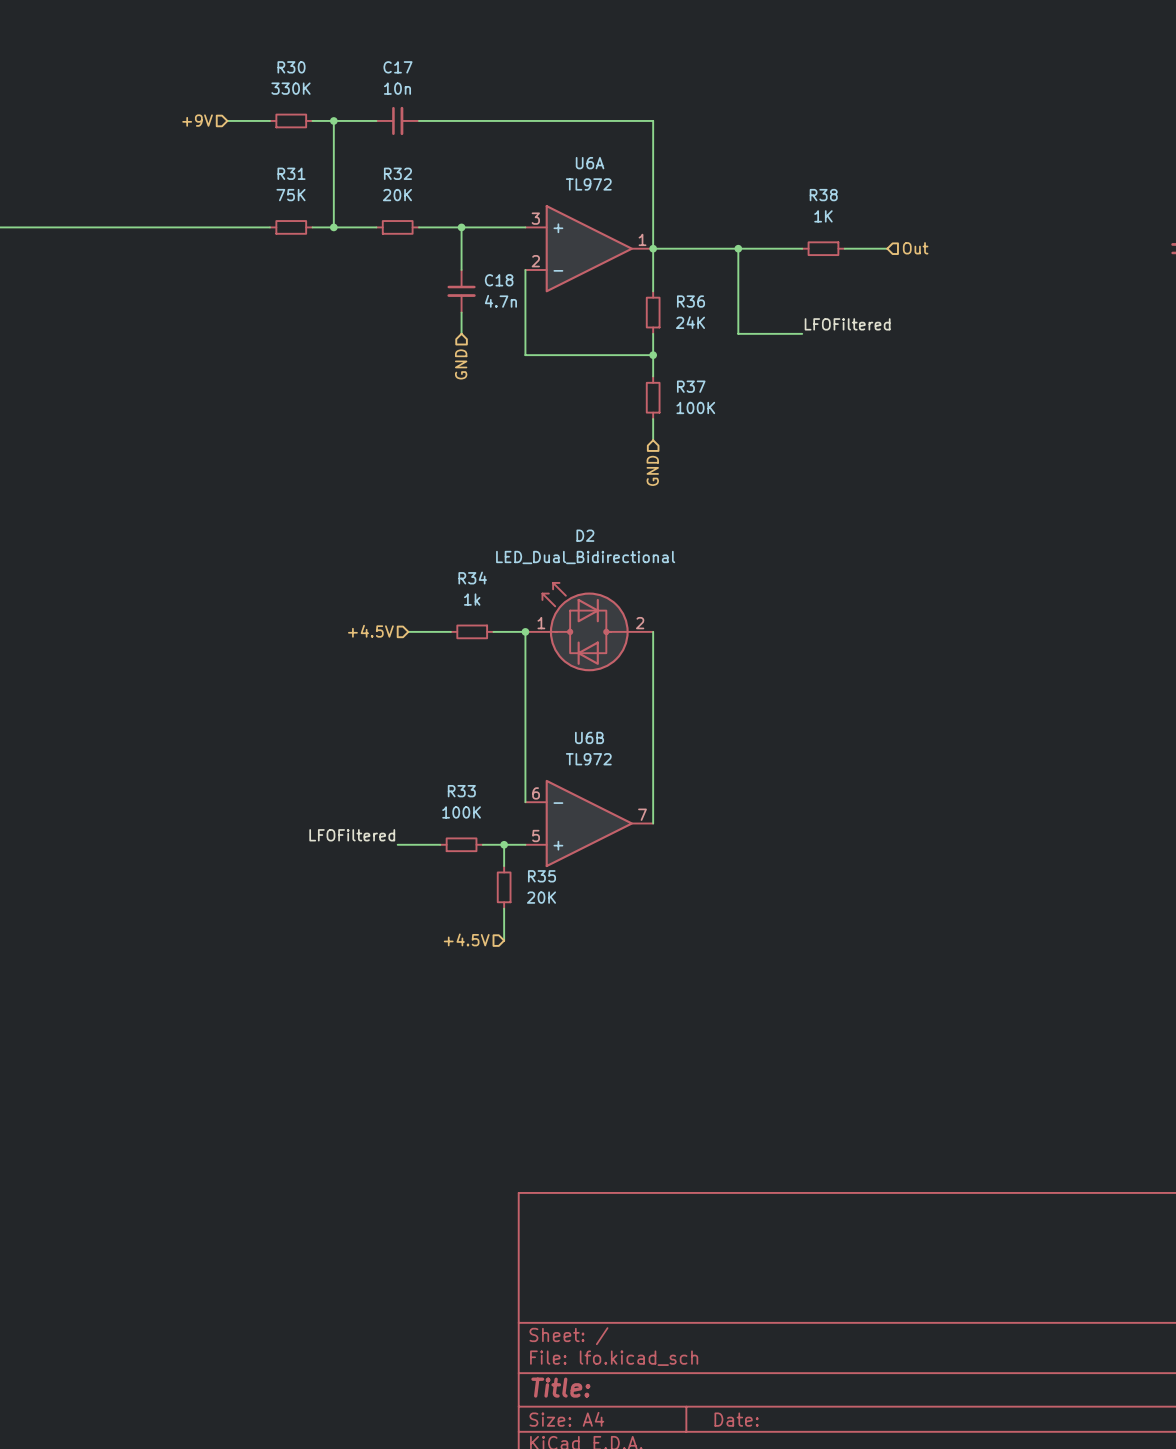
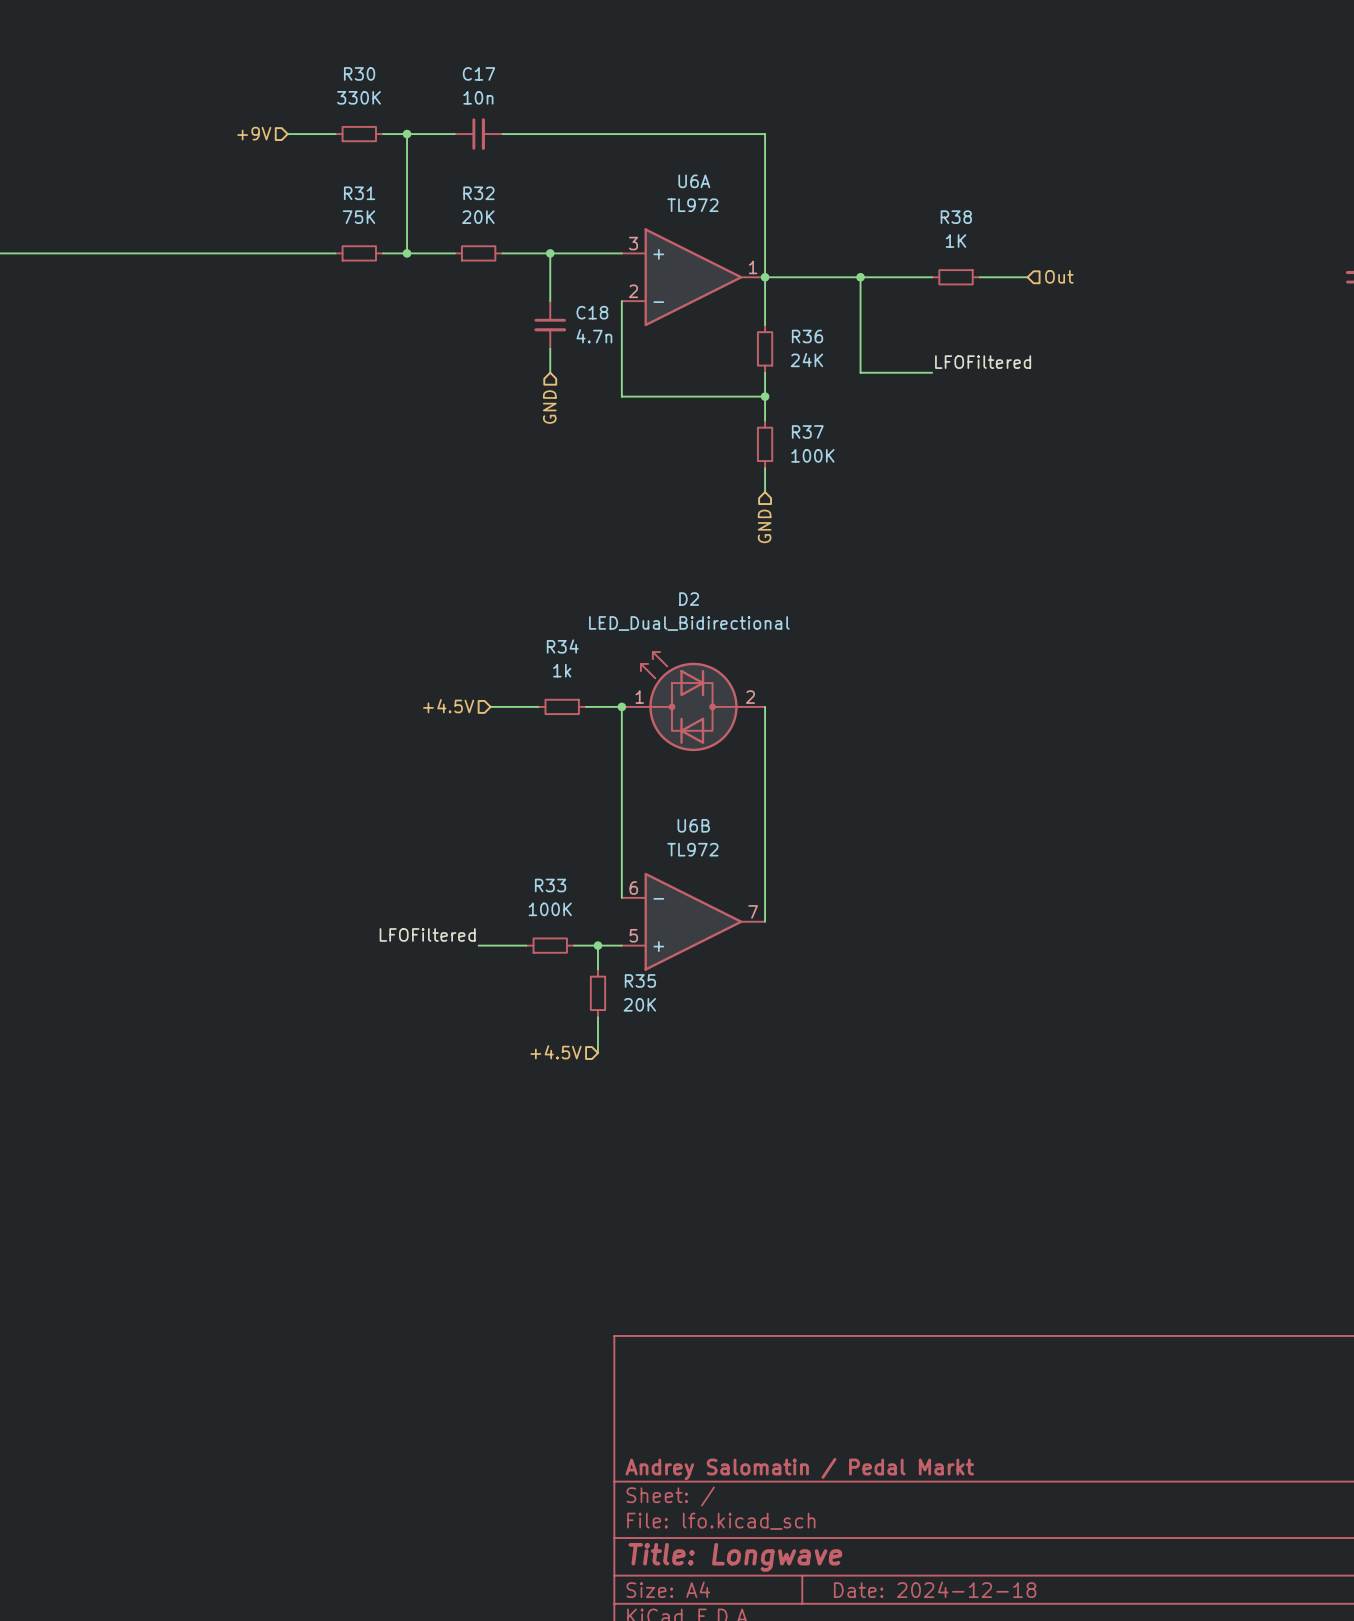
title block: none -> Andrey Salomatin / Pedal Markt (799, 1469)
title block: Title: (560, 1387) -> Title: Longwave (735, 1557)
title block: Date: (736, 1419) -> Date: 2024-12-18 (935, 1589)

